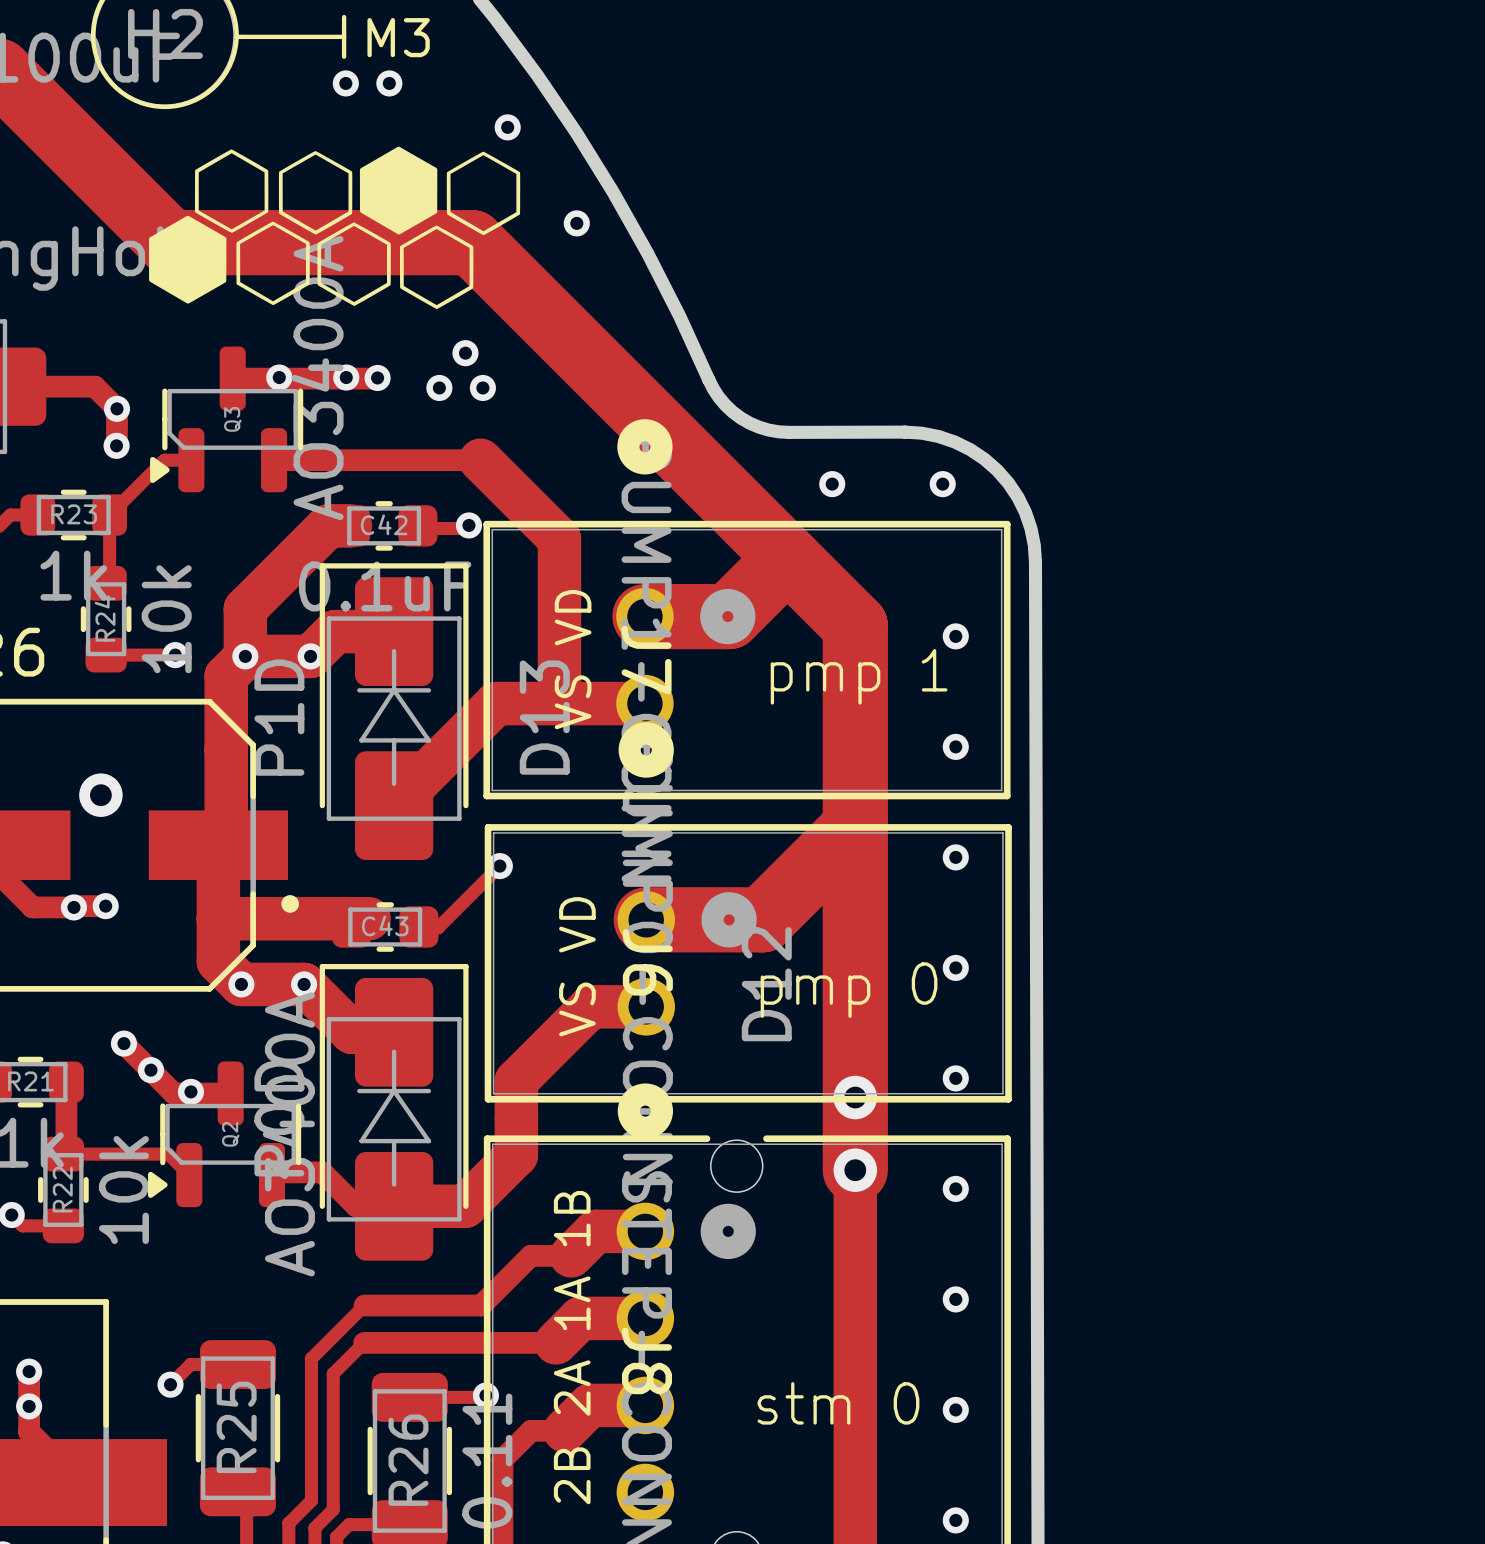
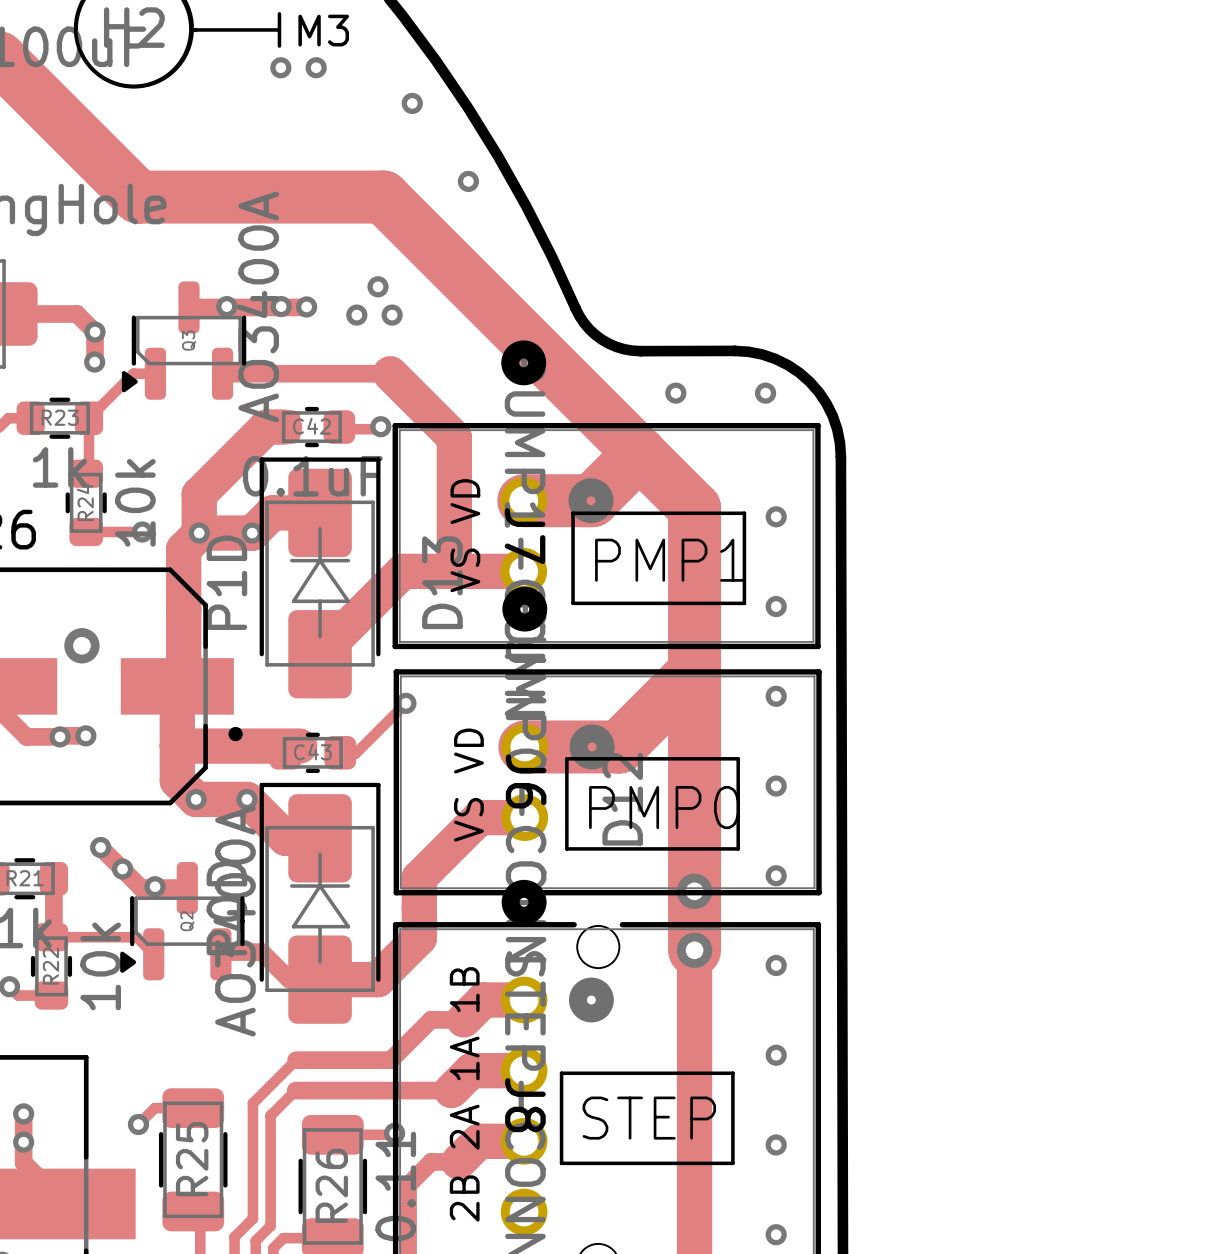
drawing: [149, 146, 521, 310] -> none
line: none -> (573, 513) (744, 513) (744, 603) (573, 603) (573, 513)
text: pmp 1 (859, 676) -> none
text: none -> PMP1 (670, 560)
line: none -> (566, 758) (738, 758) (738, 848) (566, 848) (566, 758)
text: pmp 0 (849, 990) -> PMP0 (664, 807)
line: none -> (561, 1073) (732, 1073) (732, 1163) (561, 1163) (561, 1073)
text: none -> STEP (649, 1118)
text: stm 0 (838, 1403) -> none

